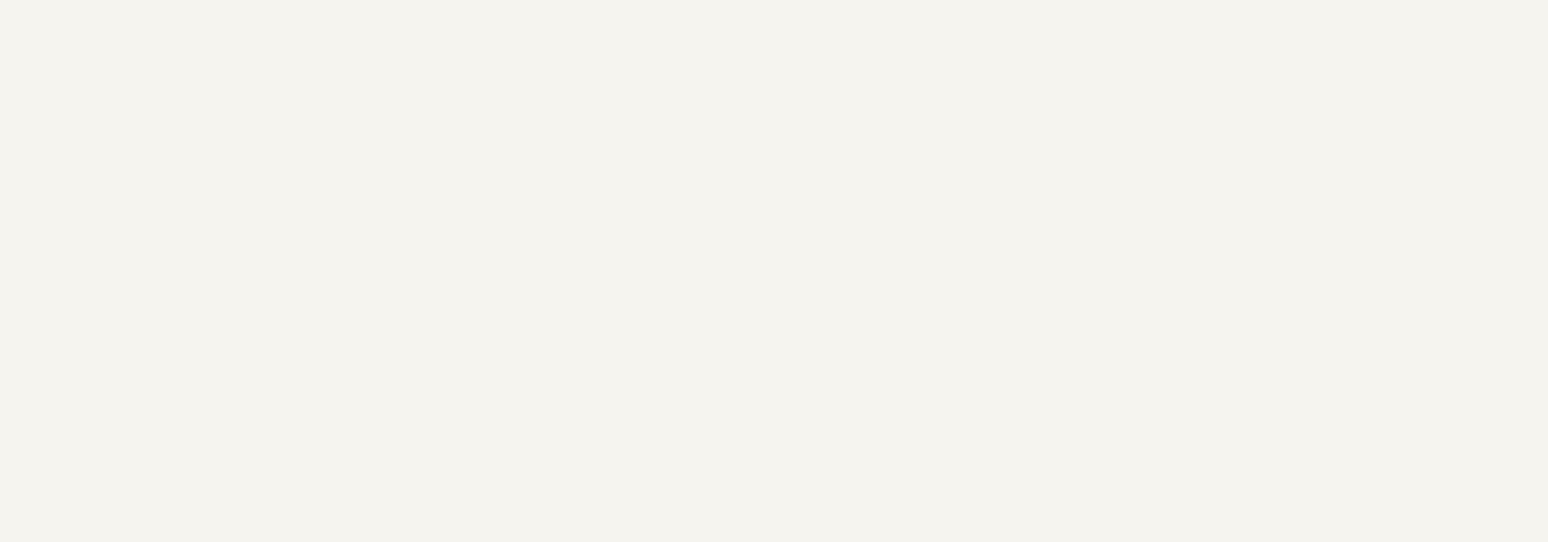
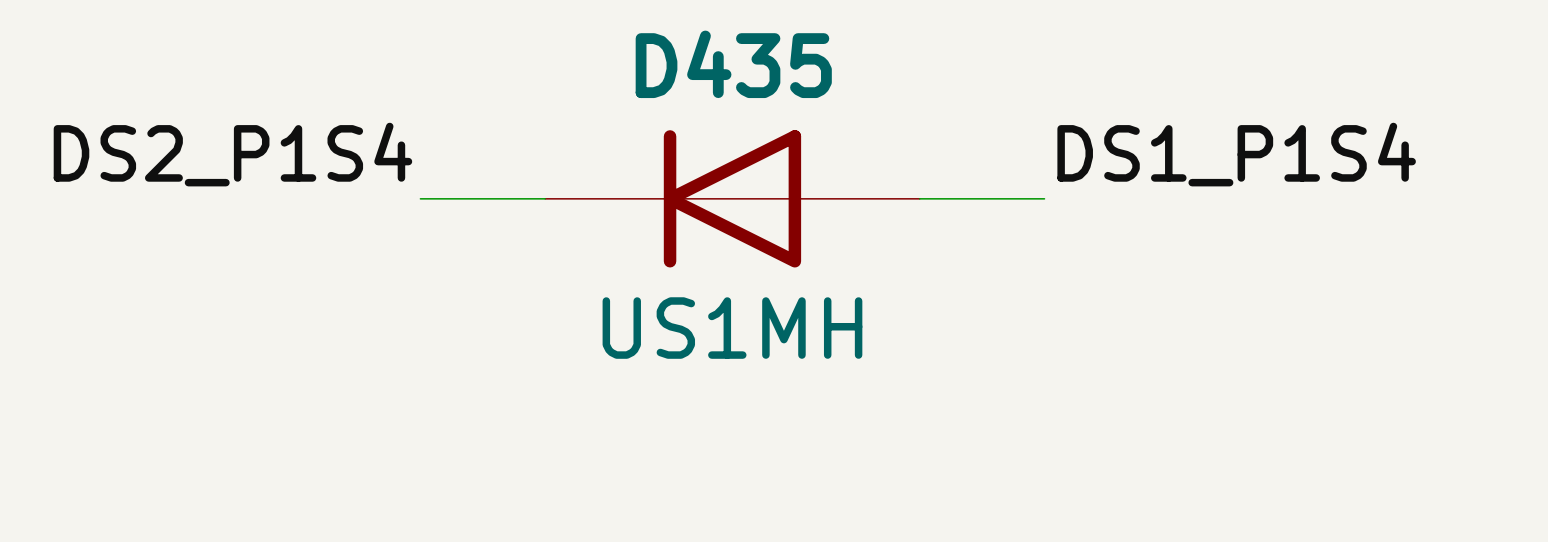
label: none -> DS2_P1S4 (232, 154)
label: none -> DS1_P1S4 (1236, 154)
wire: none -> (420, 198) (545, 198)
D435: none -> US1MH (732, 198)
wire: none -> (919, 198) (1044, 198)

